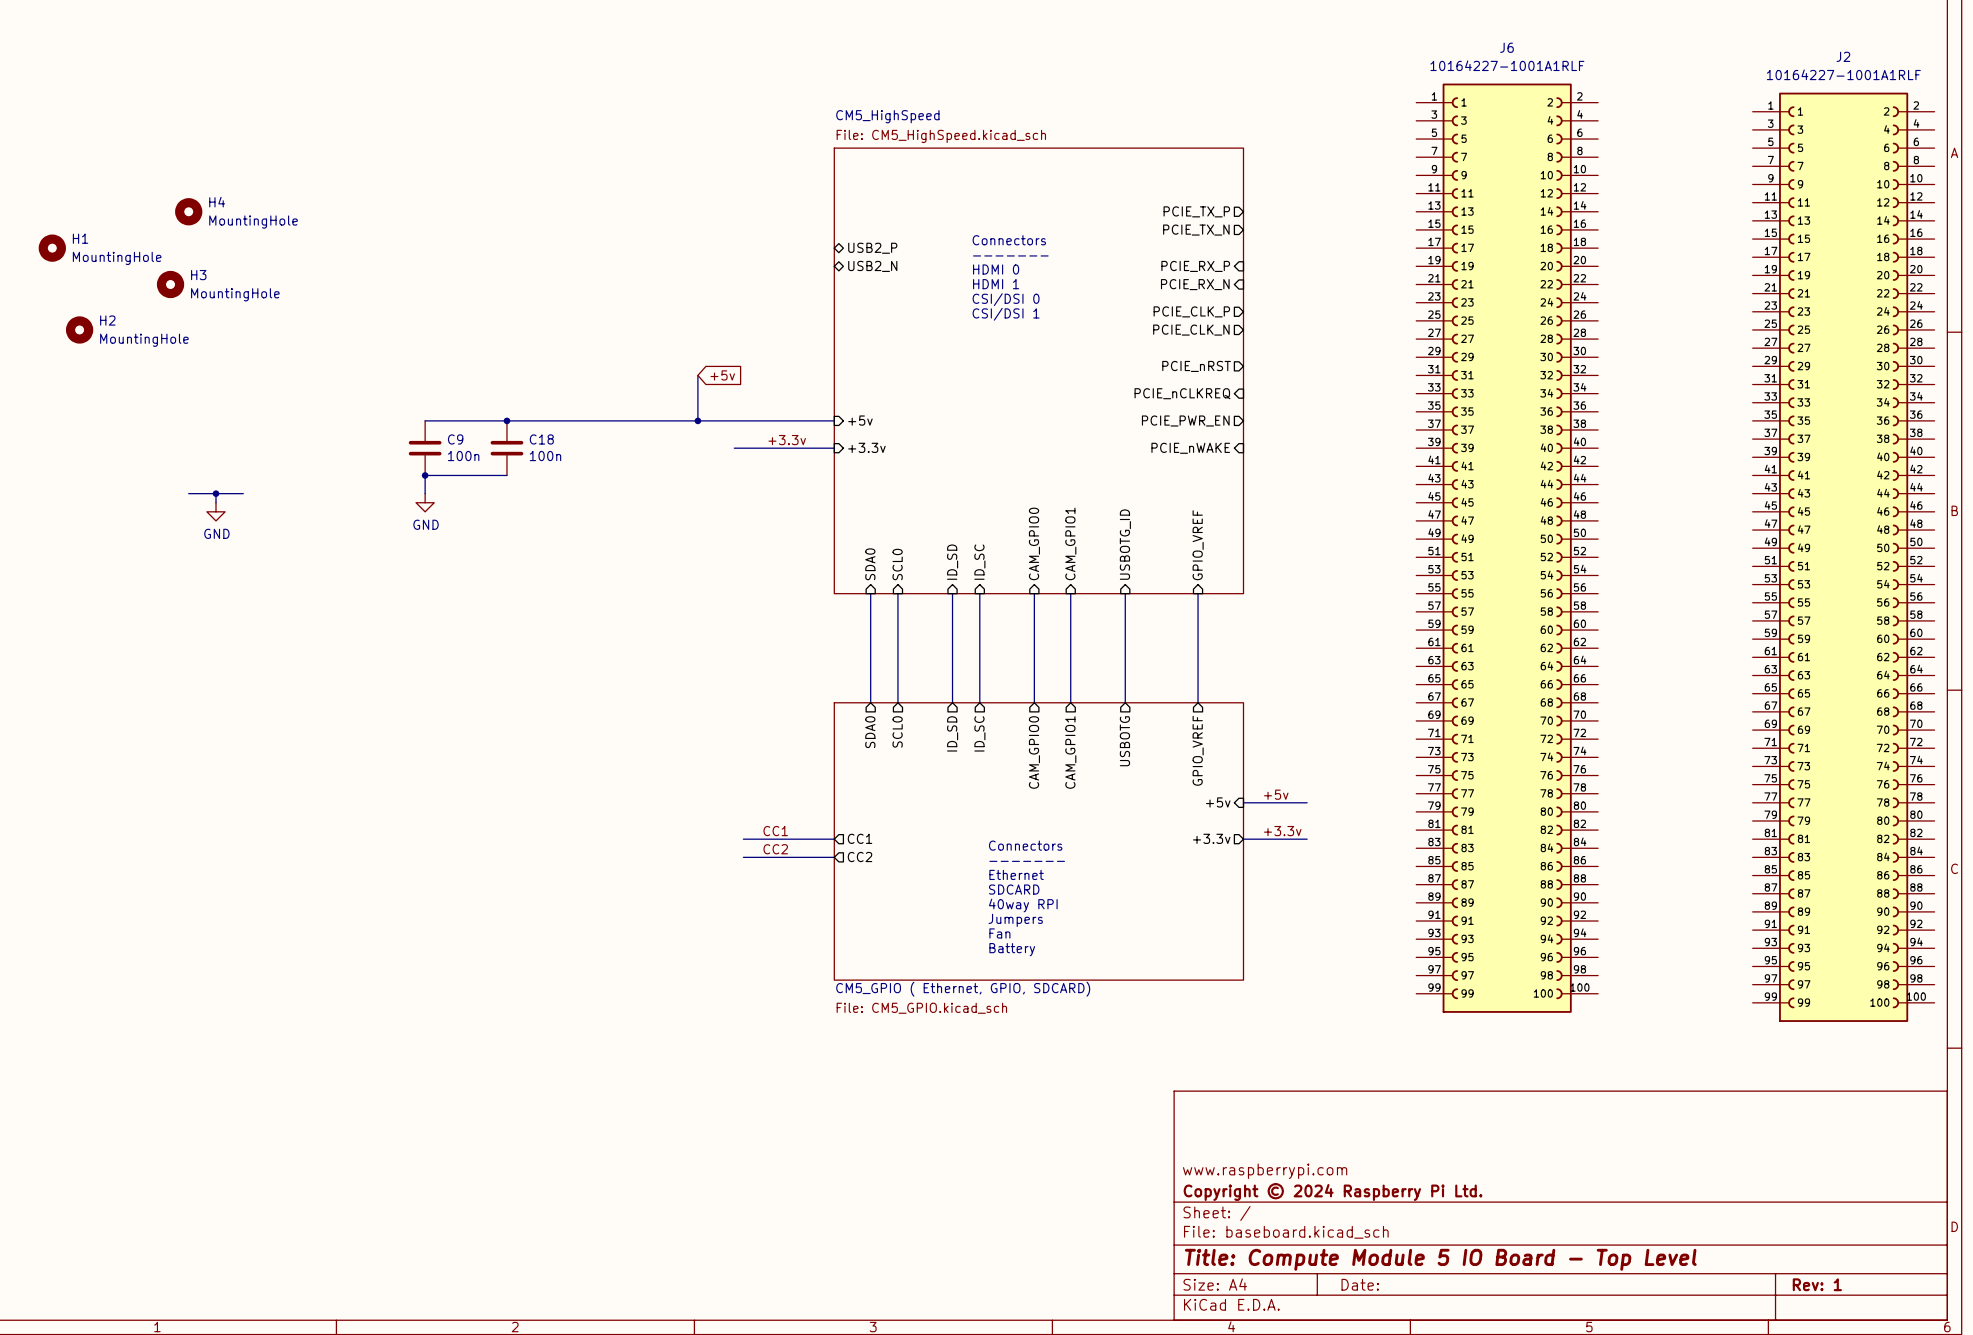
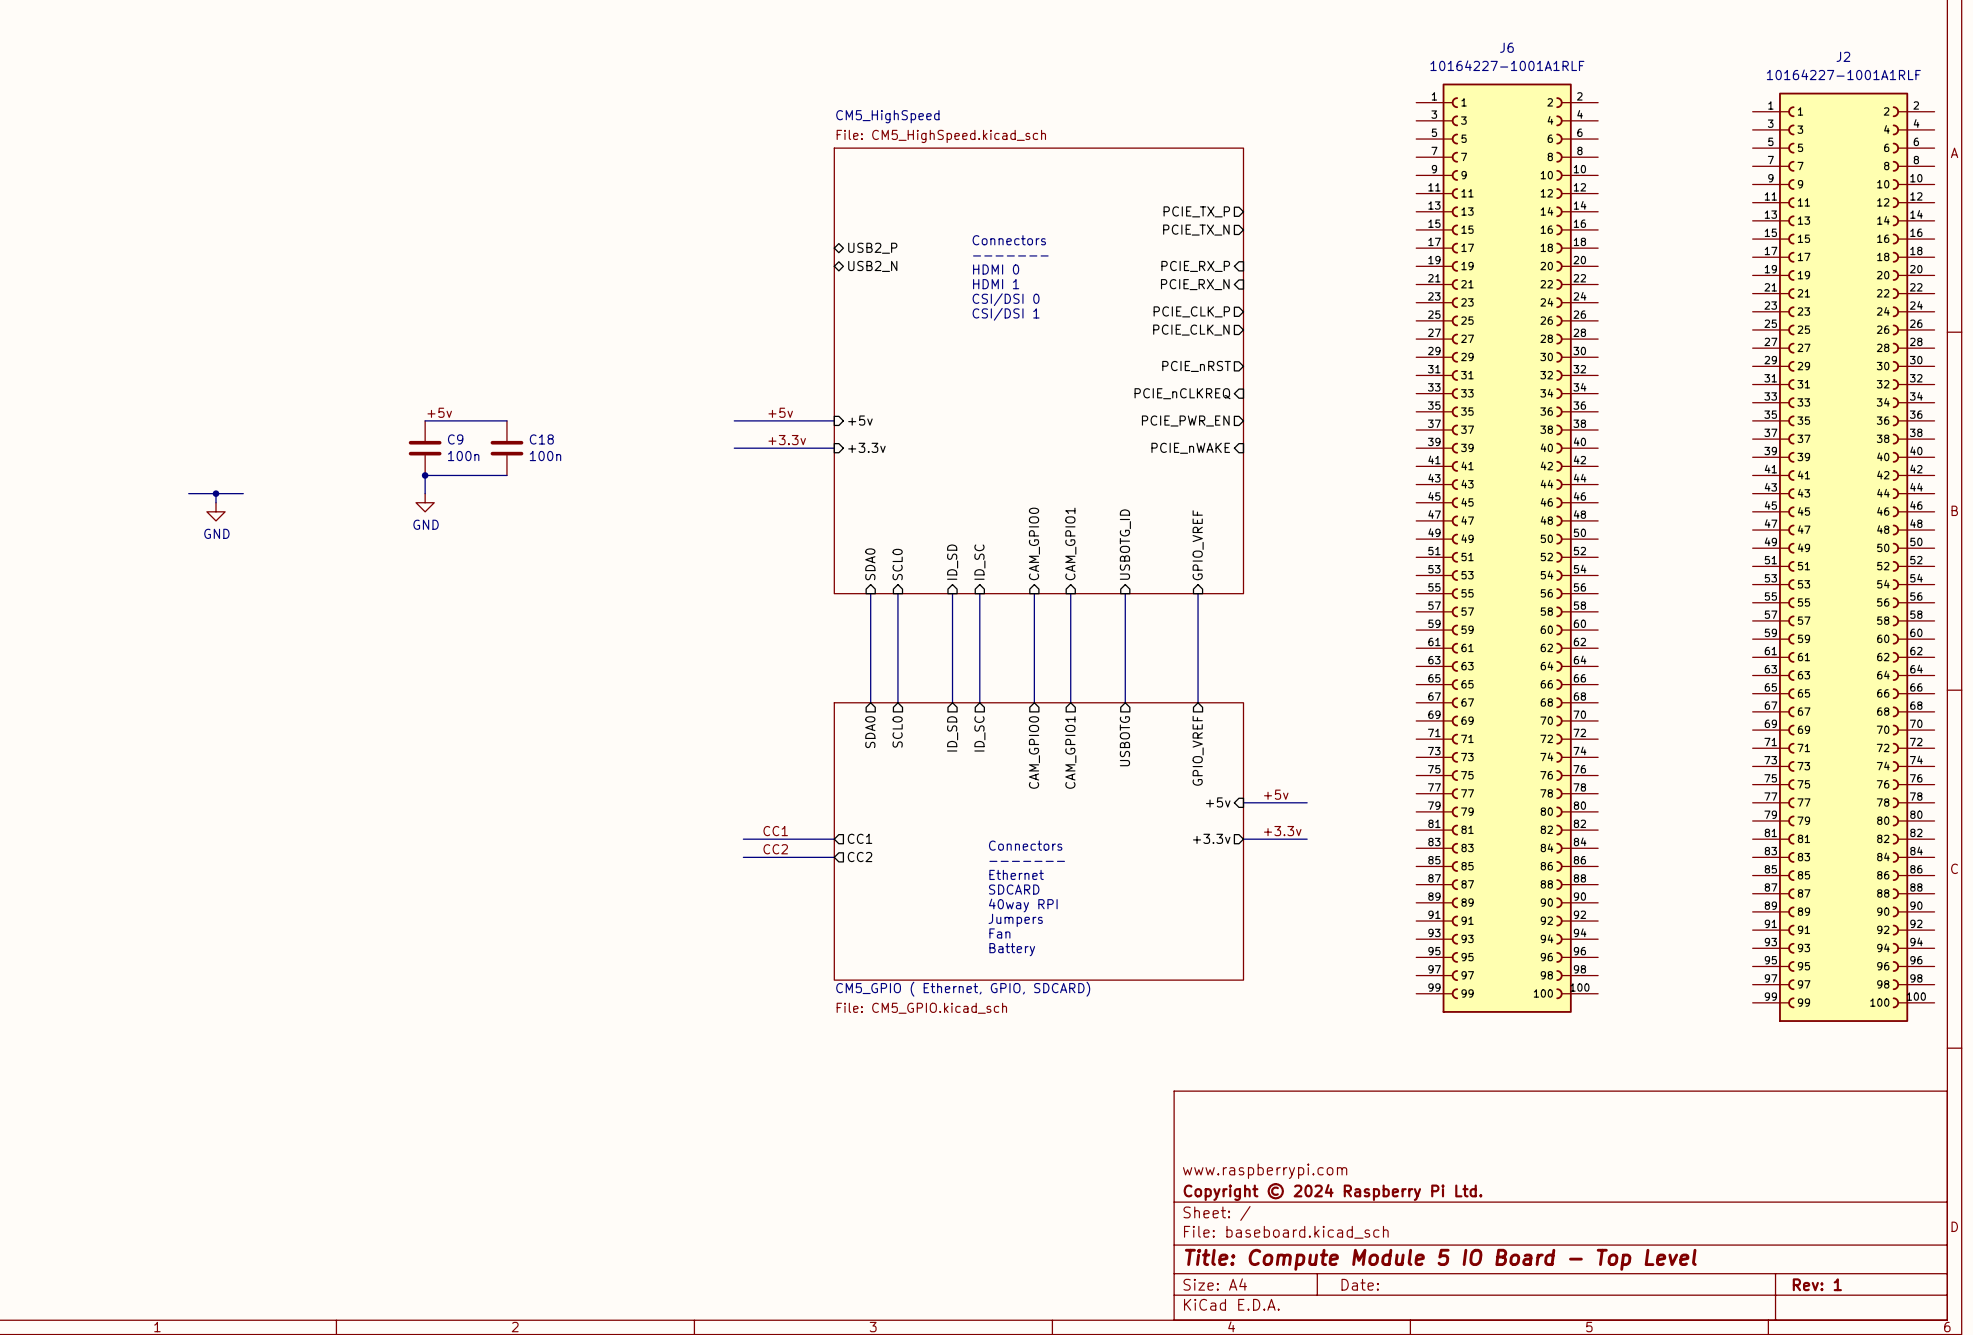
H4: MountingHole (188, 211) -> none
H1: MountingHole (52, 248) -> none
H3: MountingHole (170, 284) -> none
H2: MountingHole (79, 329) -> none
wire: (697, 375) (697, 420) -> none
global label: +5v (722, 375) -> none
label: none -> +5v (439, 412)
label: none -> +5v (780, 412)
wire: (506, 420) (734, 420) -> none
junction: (506, 420) -> none
junction: (697, 420) -> none

